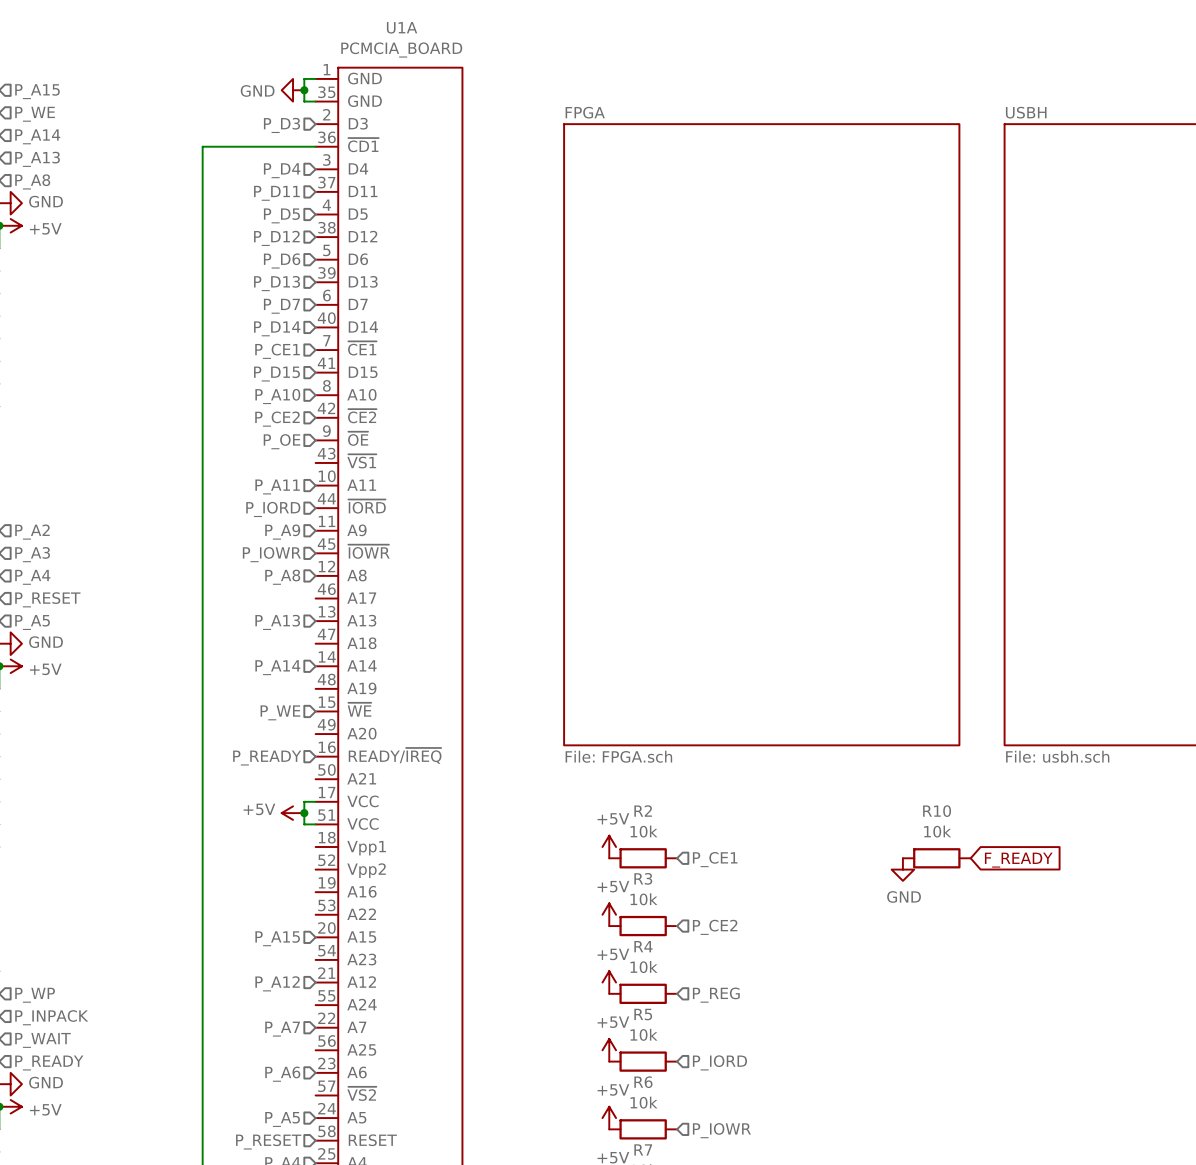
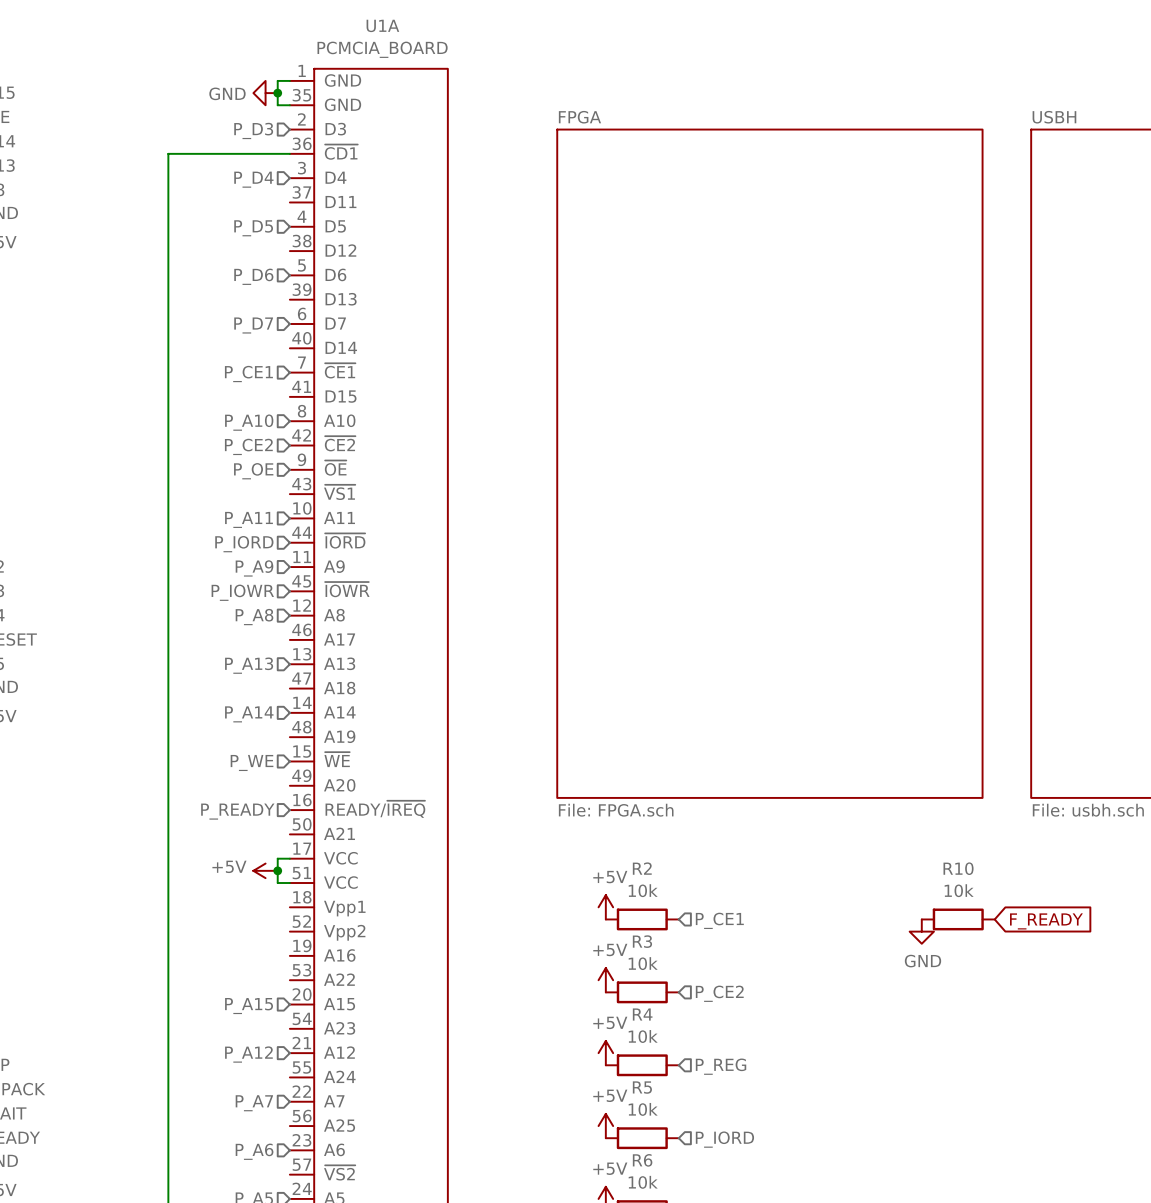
hierarchical label: P_D11 (276, 193) -> none
hierarchical label: P_D12 (276, 238) -> none
hierarchical label: P_D13 (277, 283) -> none
hierarchical label: P_D14 (277, 328) -> none
hierarchical label: P_D15 (276, 374) -> none

